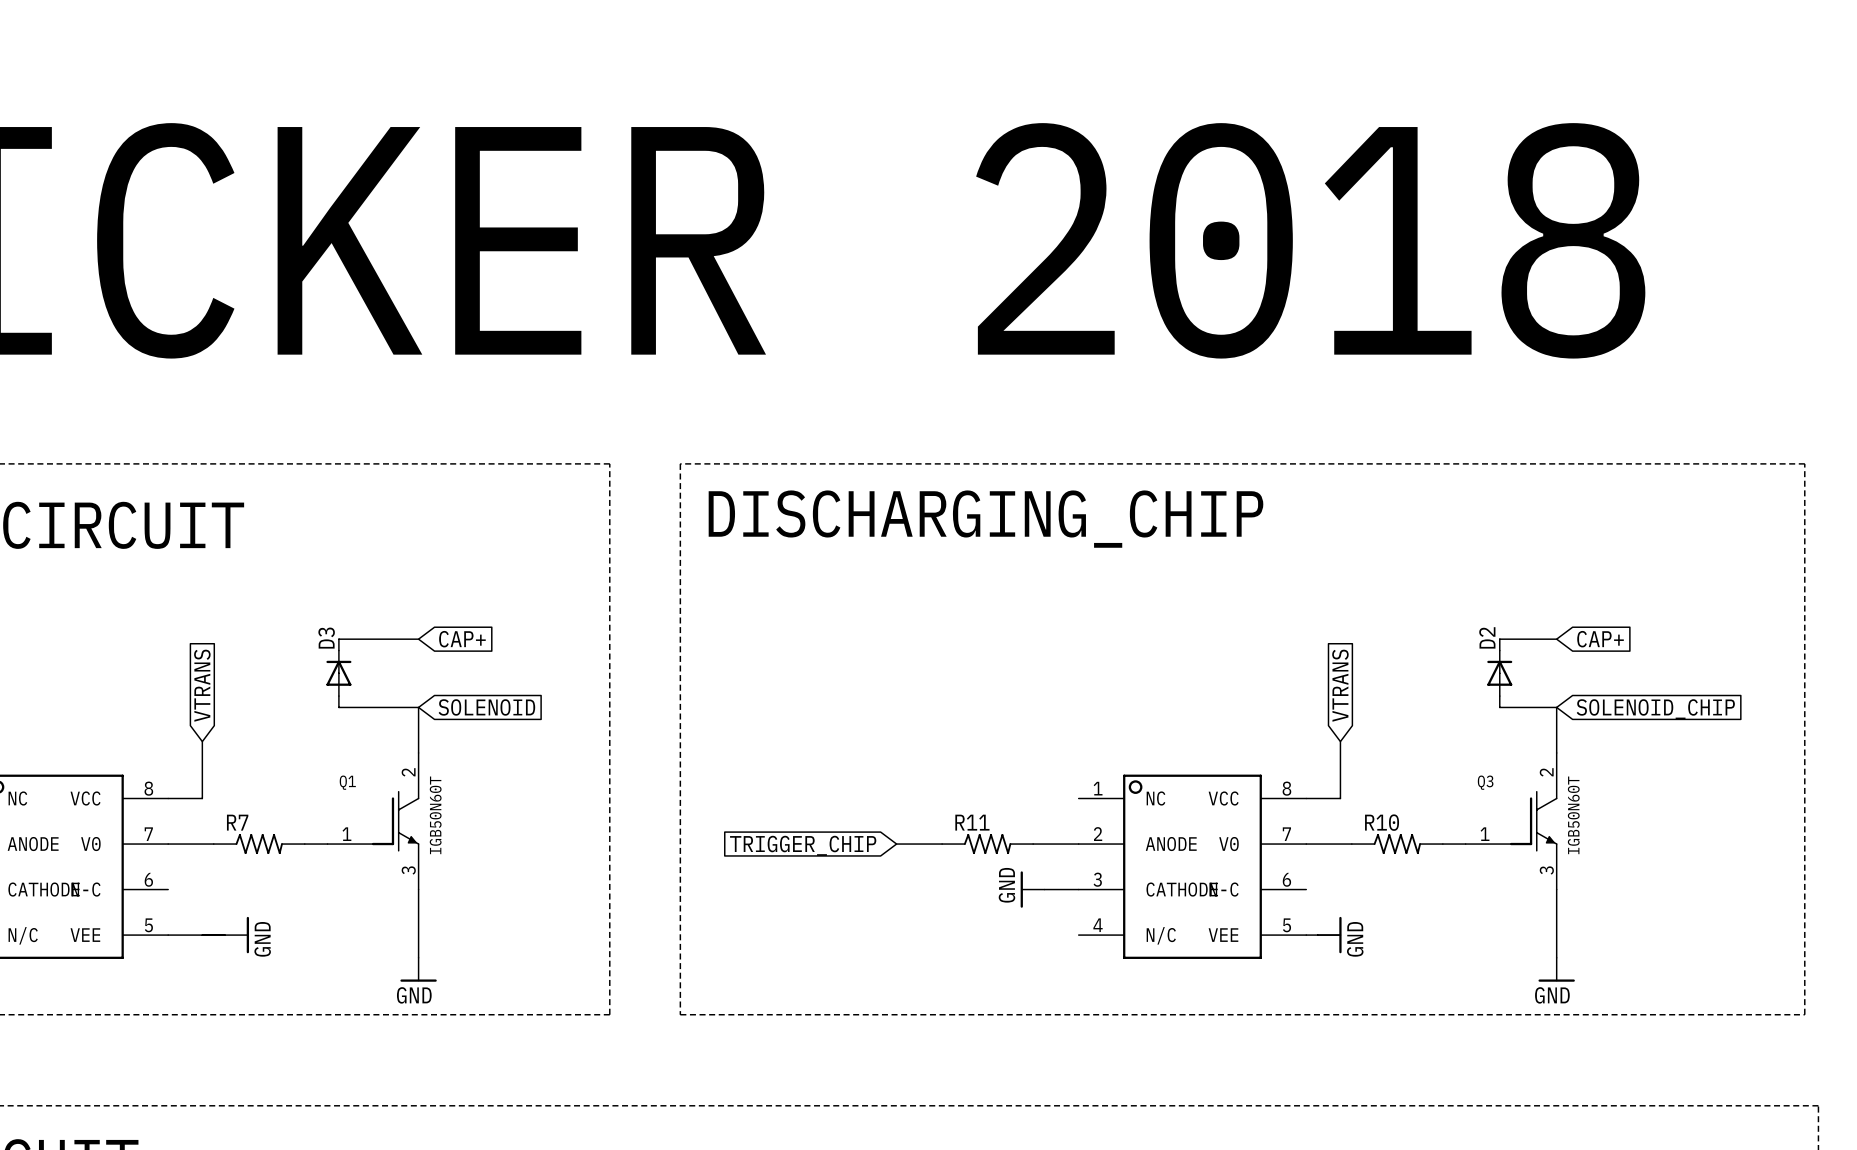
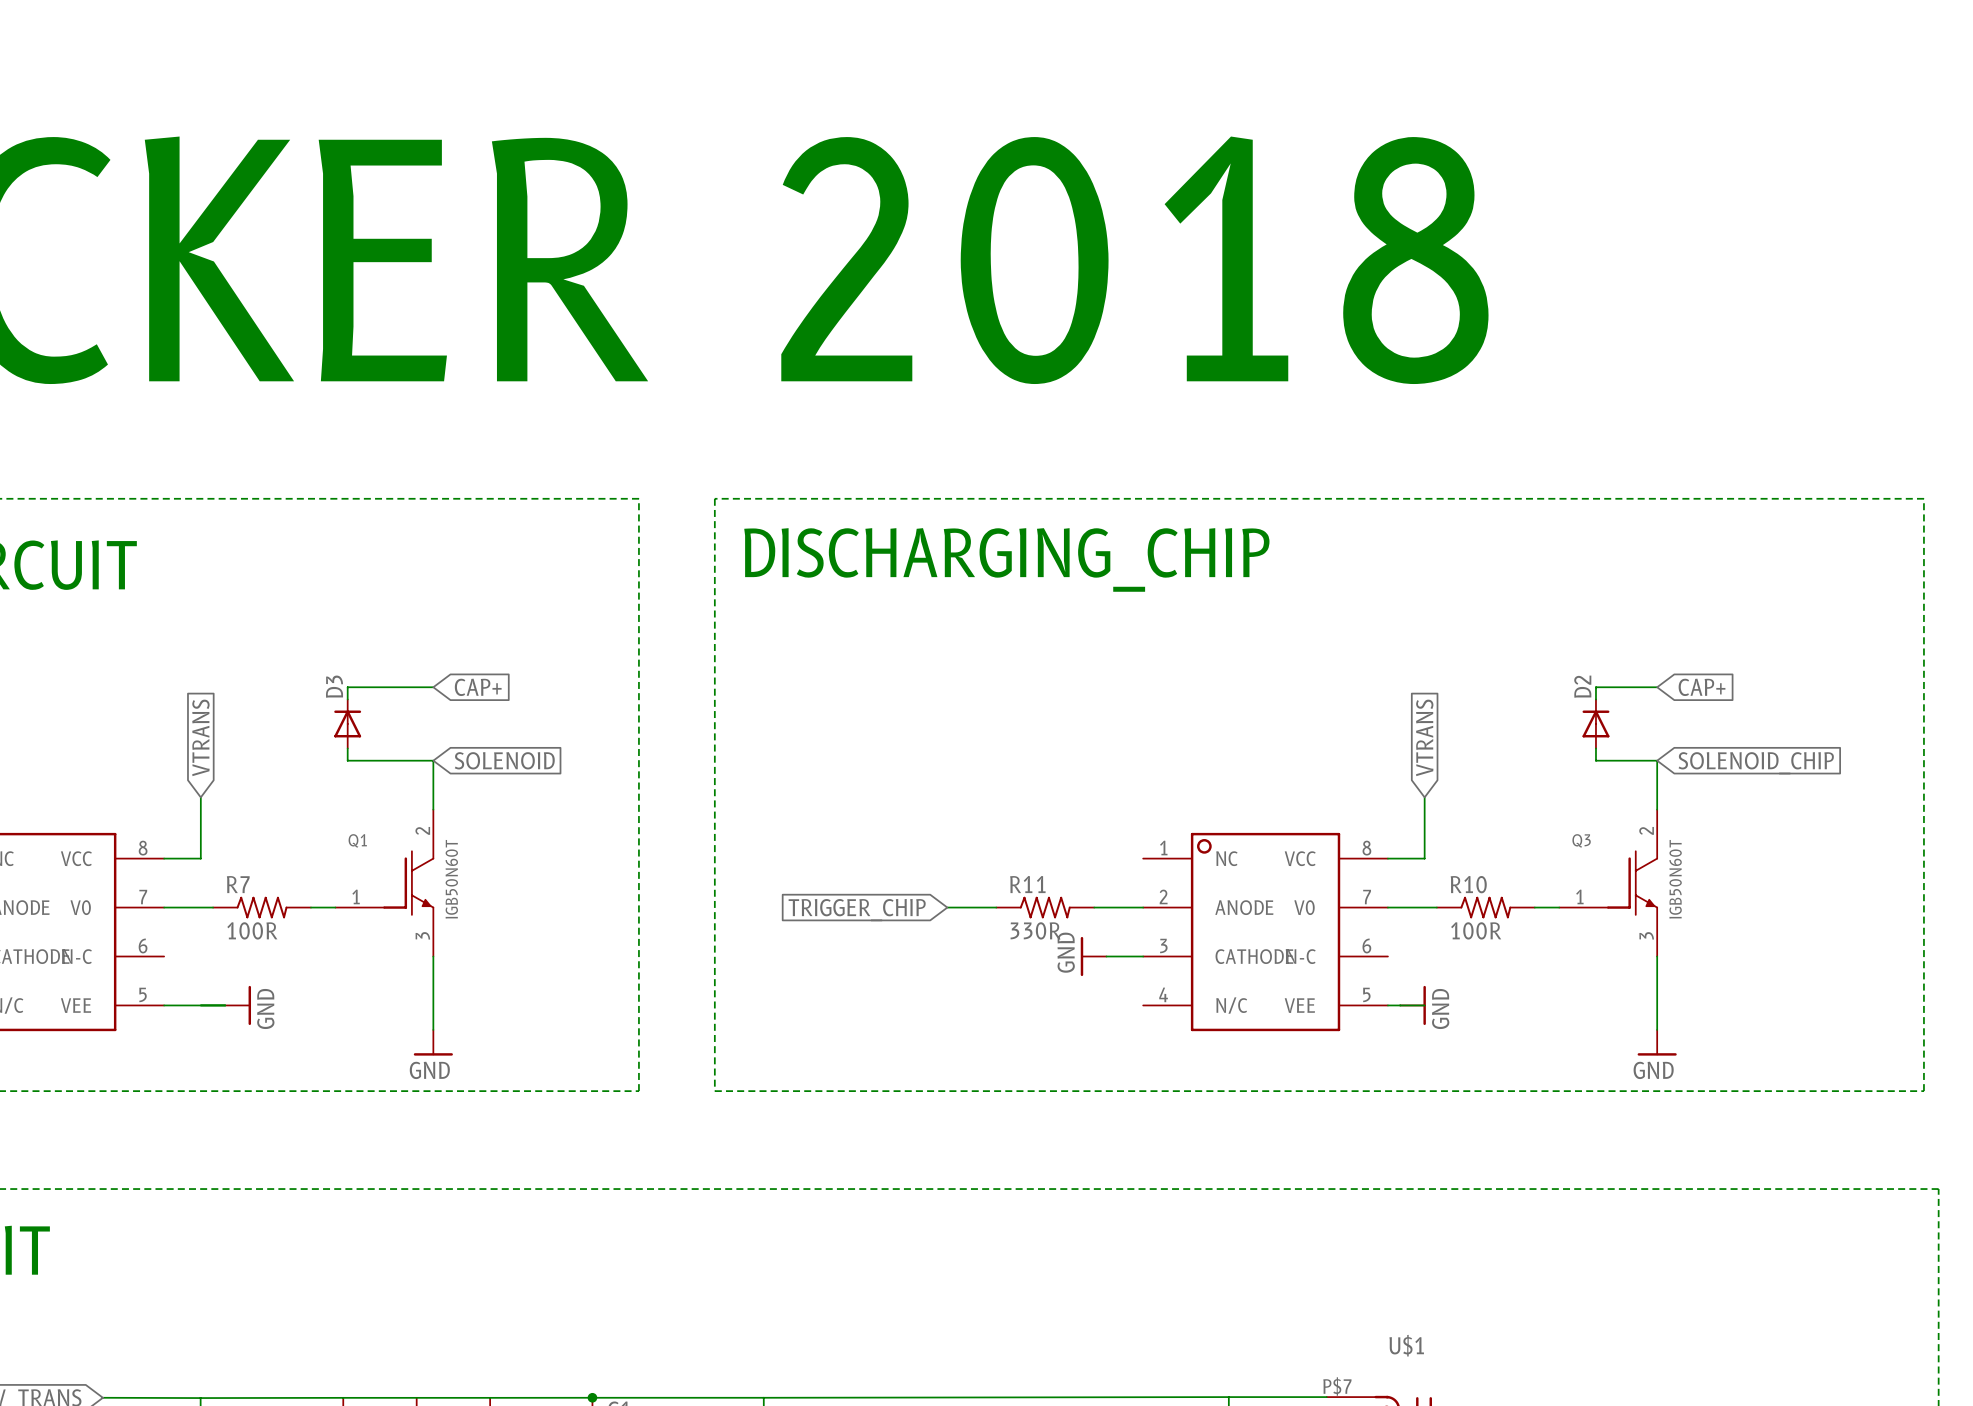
R7 value: none -> 100R (252, 930)
R11 value: none -> 330R (1035, 930)
R10 value: none -> 100R (1476, 930)

